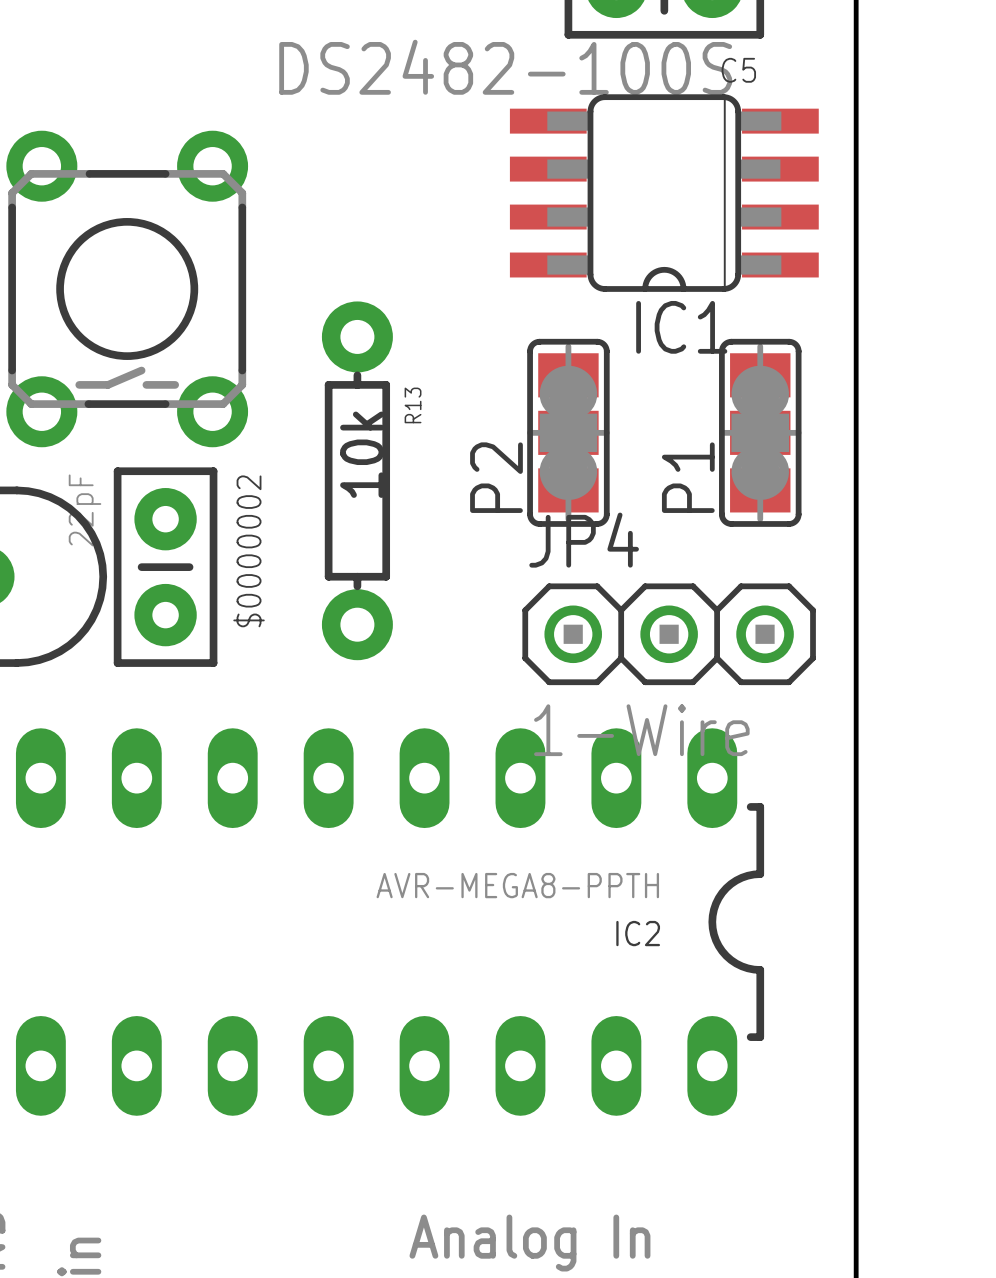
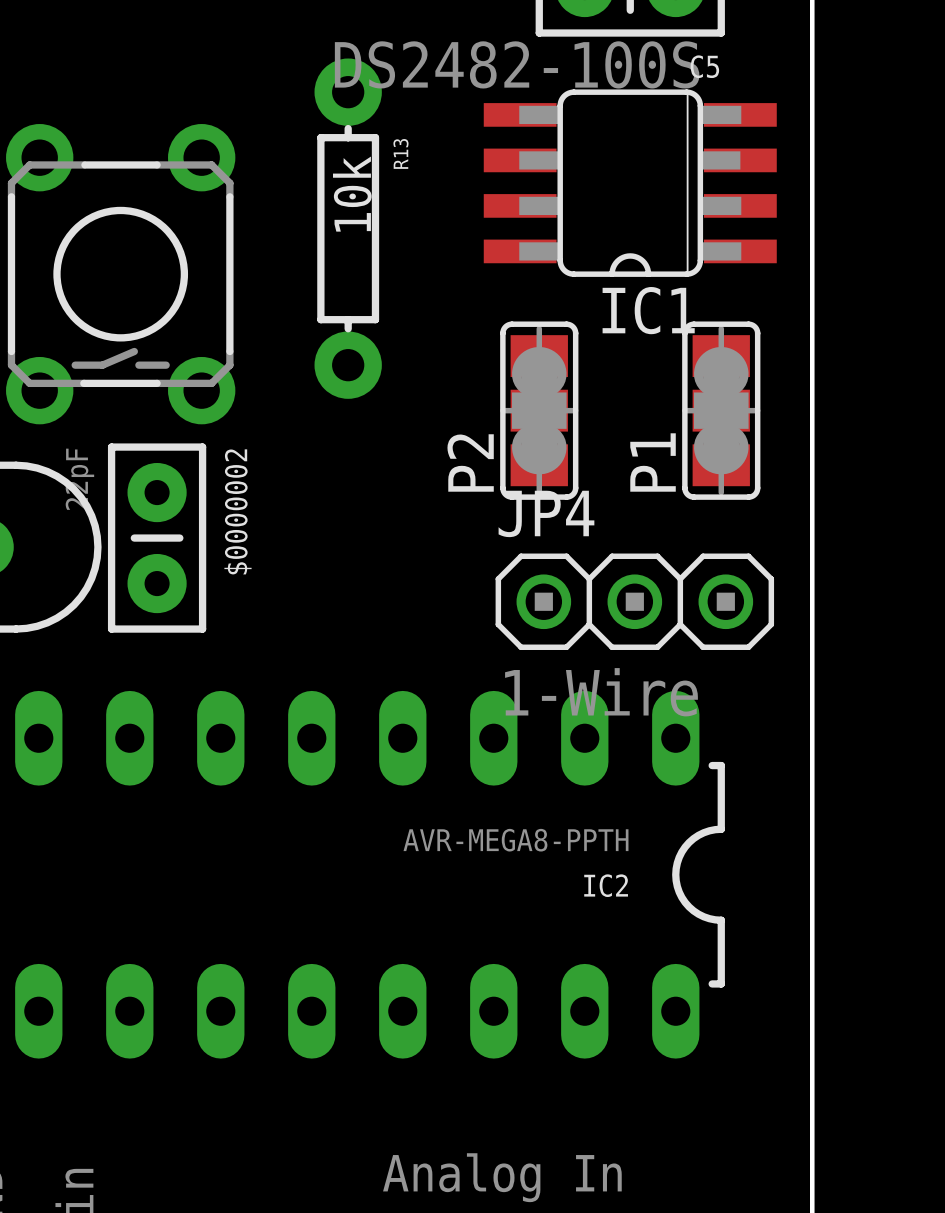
R13 position: (357, 480) -> (348, 228)

